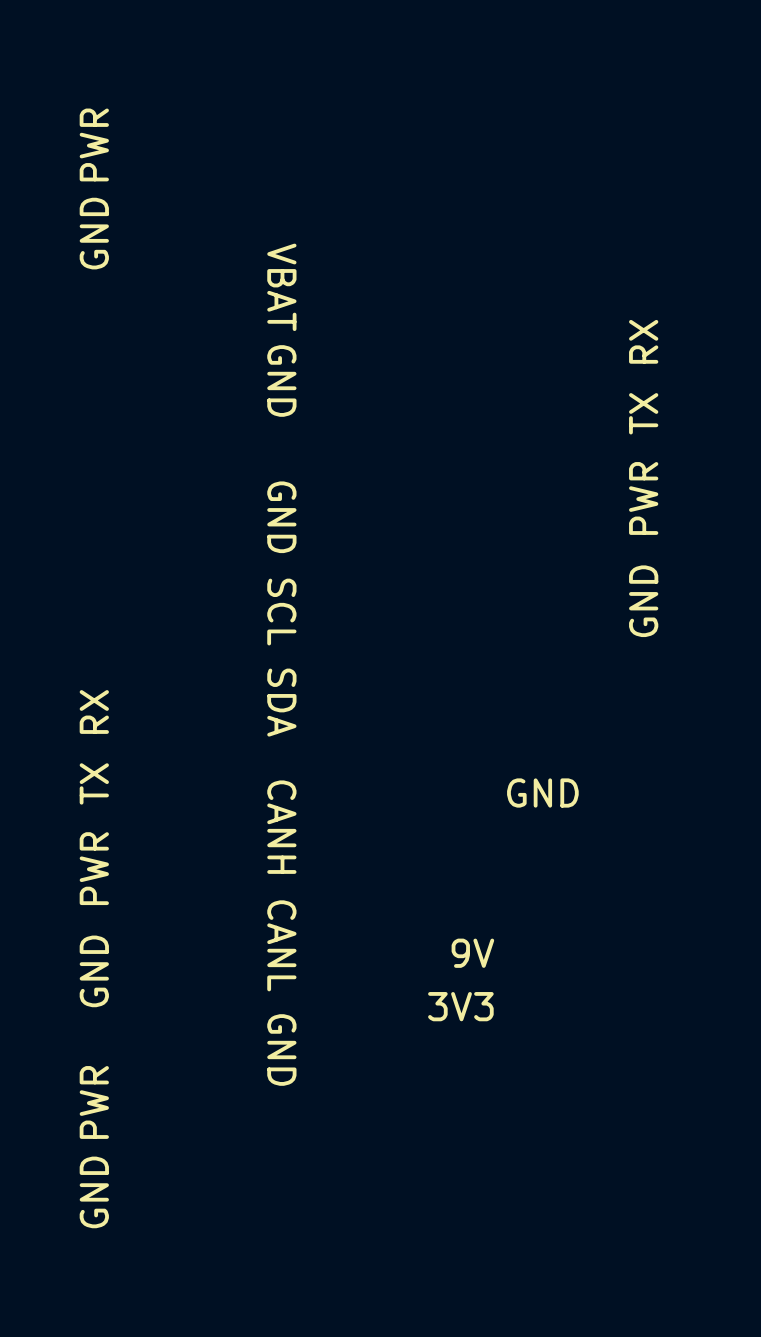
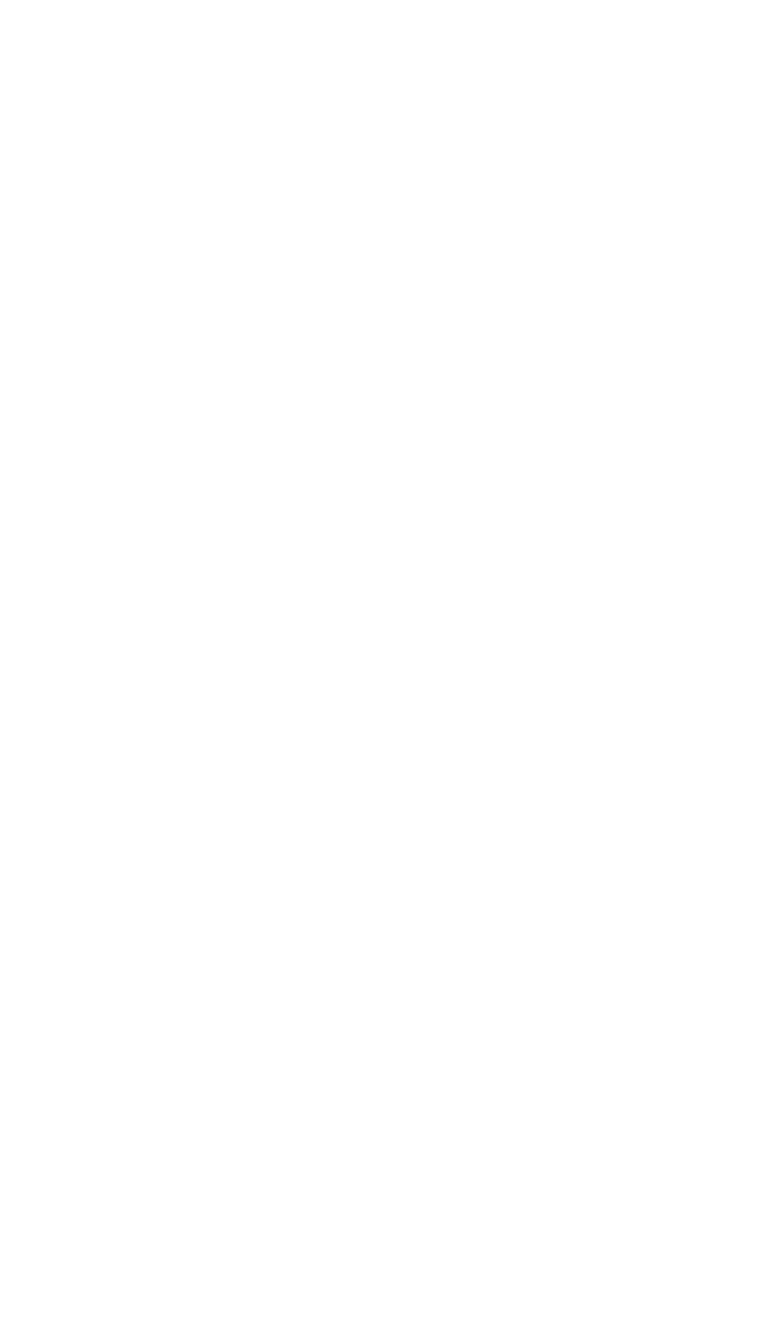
text: PWR (94, 144) -> none
text: GND (94, 233) -> none
text: VBAT (281, 287) -> none
text: RX (643, 341) -> none
text: GND (281, 380) -> none
text: TX (643, 413) -> none
text: PWR (643, 498) -> none
text: GND (281, 517) -> none
text: GND (643, 601) -> none
text: SCL (281, 612) -> none
text: SDA (281, 702) -> none
text: RX (94, 711) -> none
text: TX (94, 783) -> none
text: GND (542, 793) -> none
text: PWR (94, 868) -> none
text: CANH CANL GND (281, 933) -> none
text: 9V (472, 953) -> none
text: GND (94, 971) -> none
text: 3V3 (460, 1006) -> none
text: PWR (94, 1102) -> none
text: GND (94, 1192) -> none

